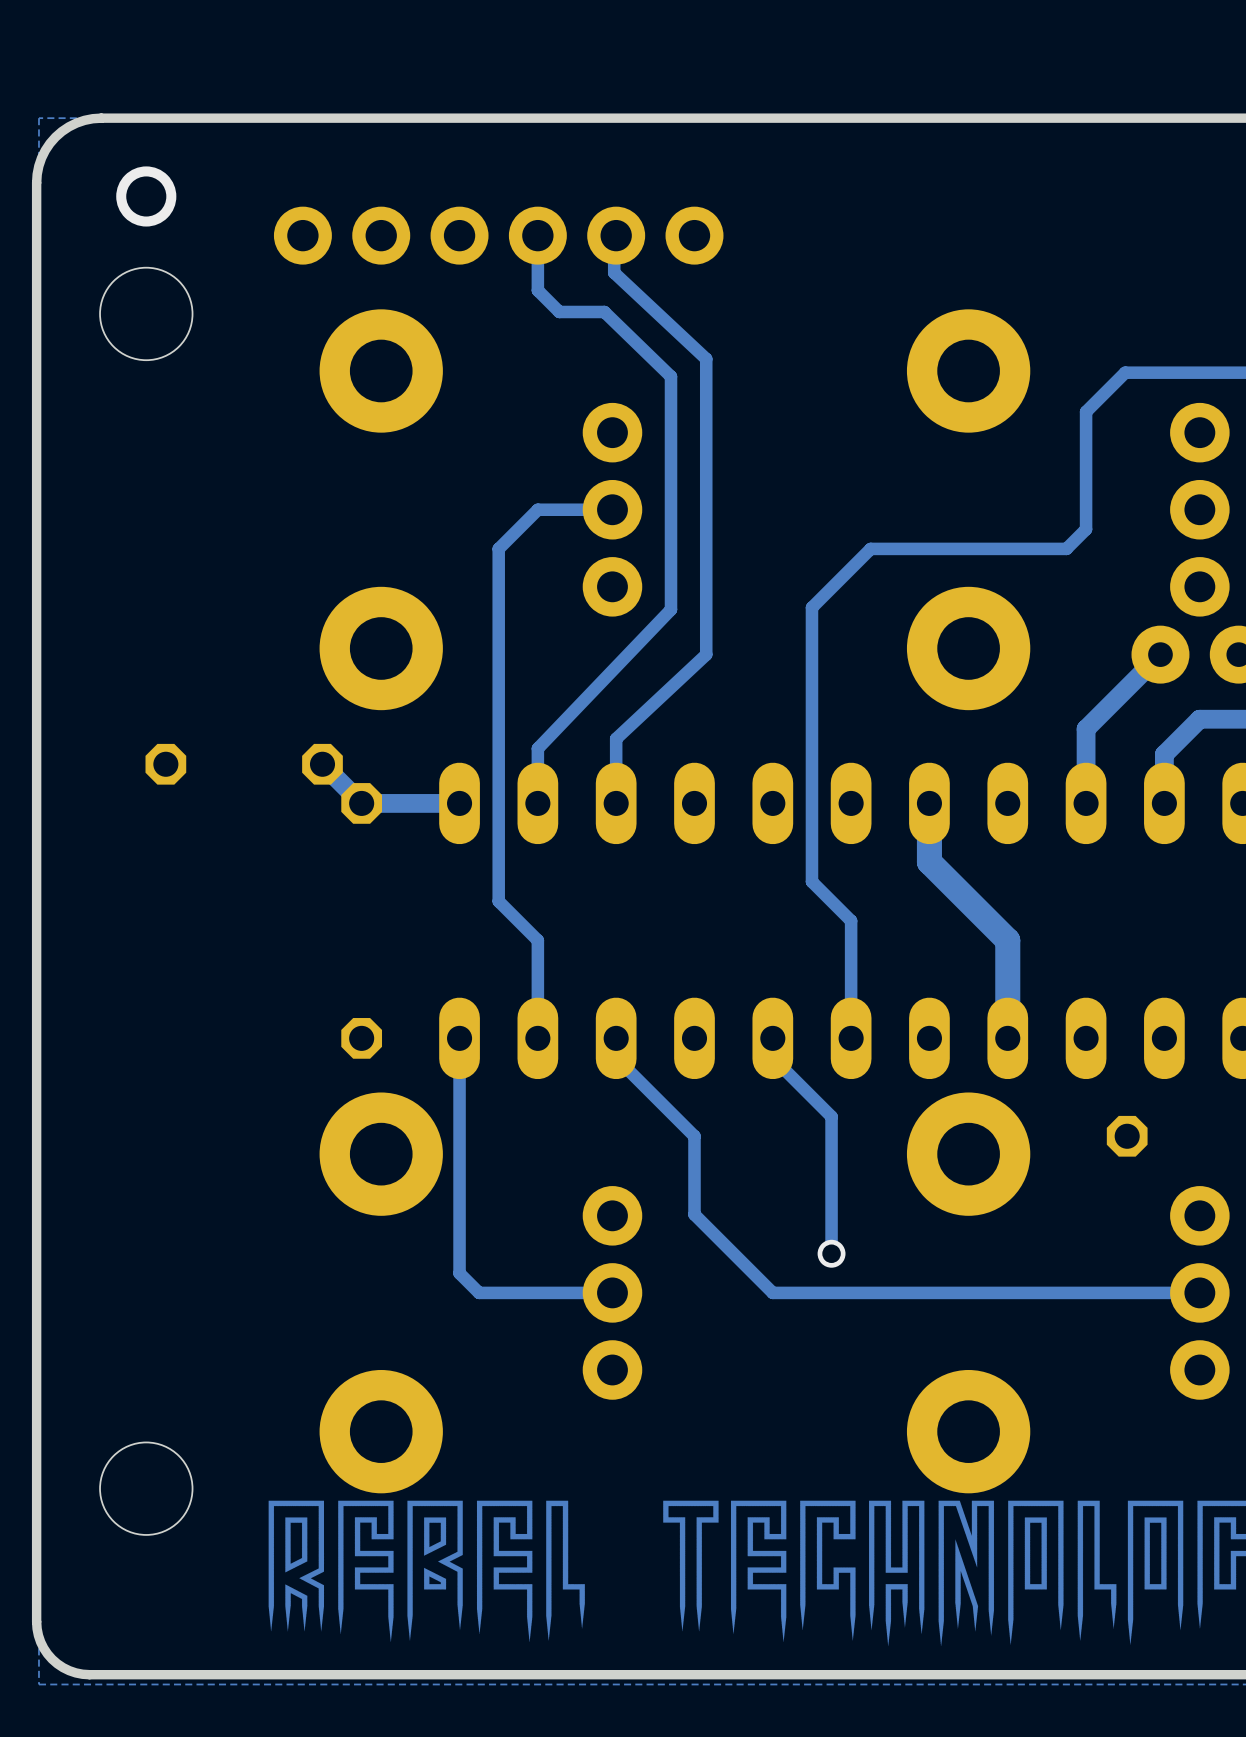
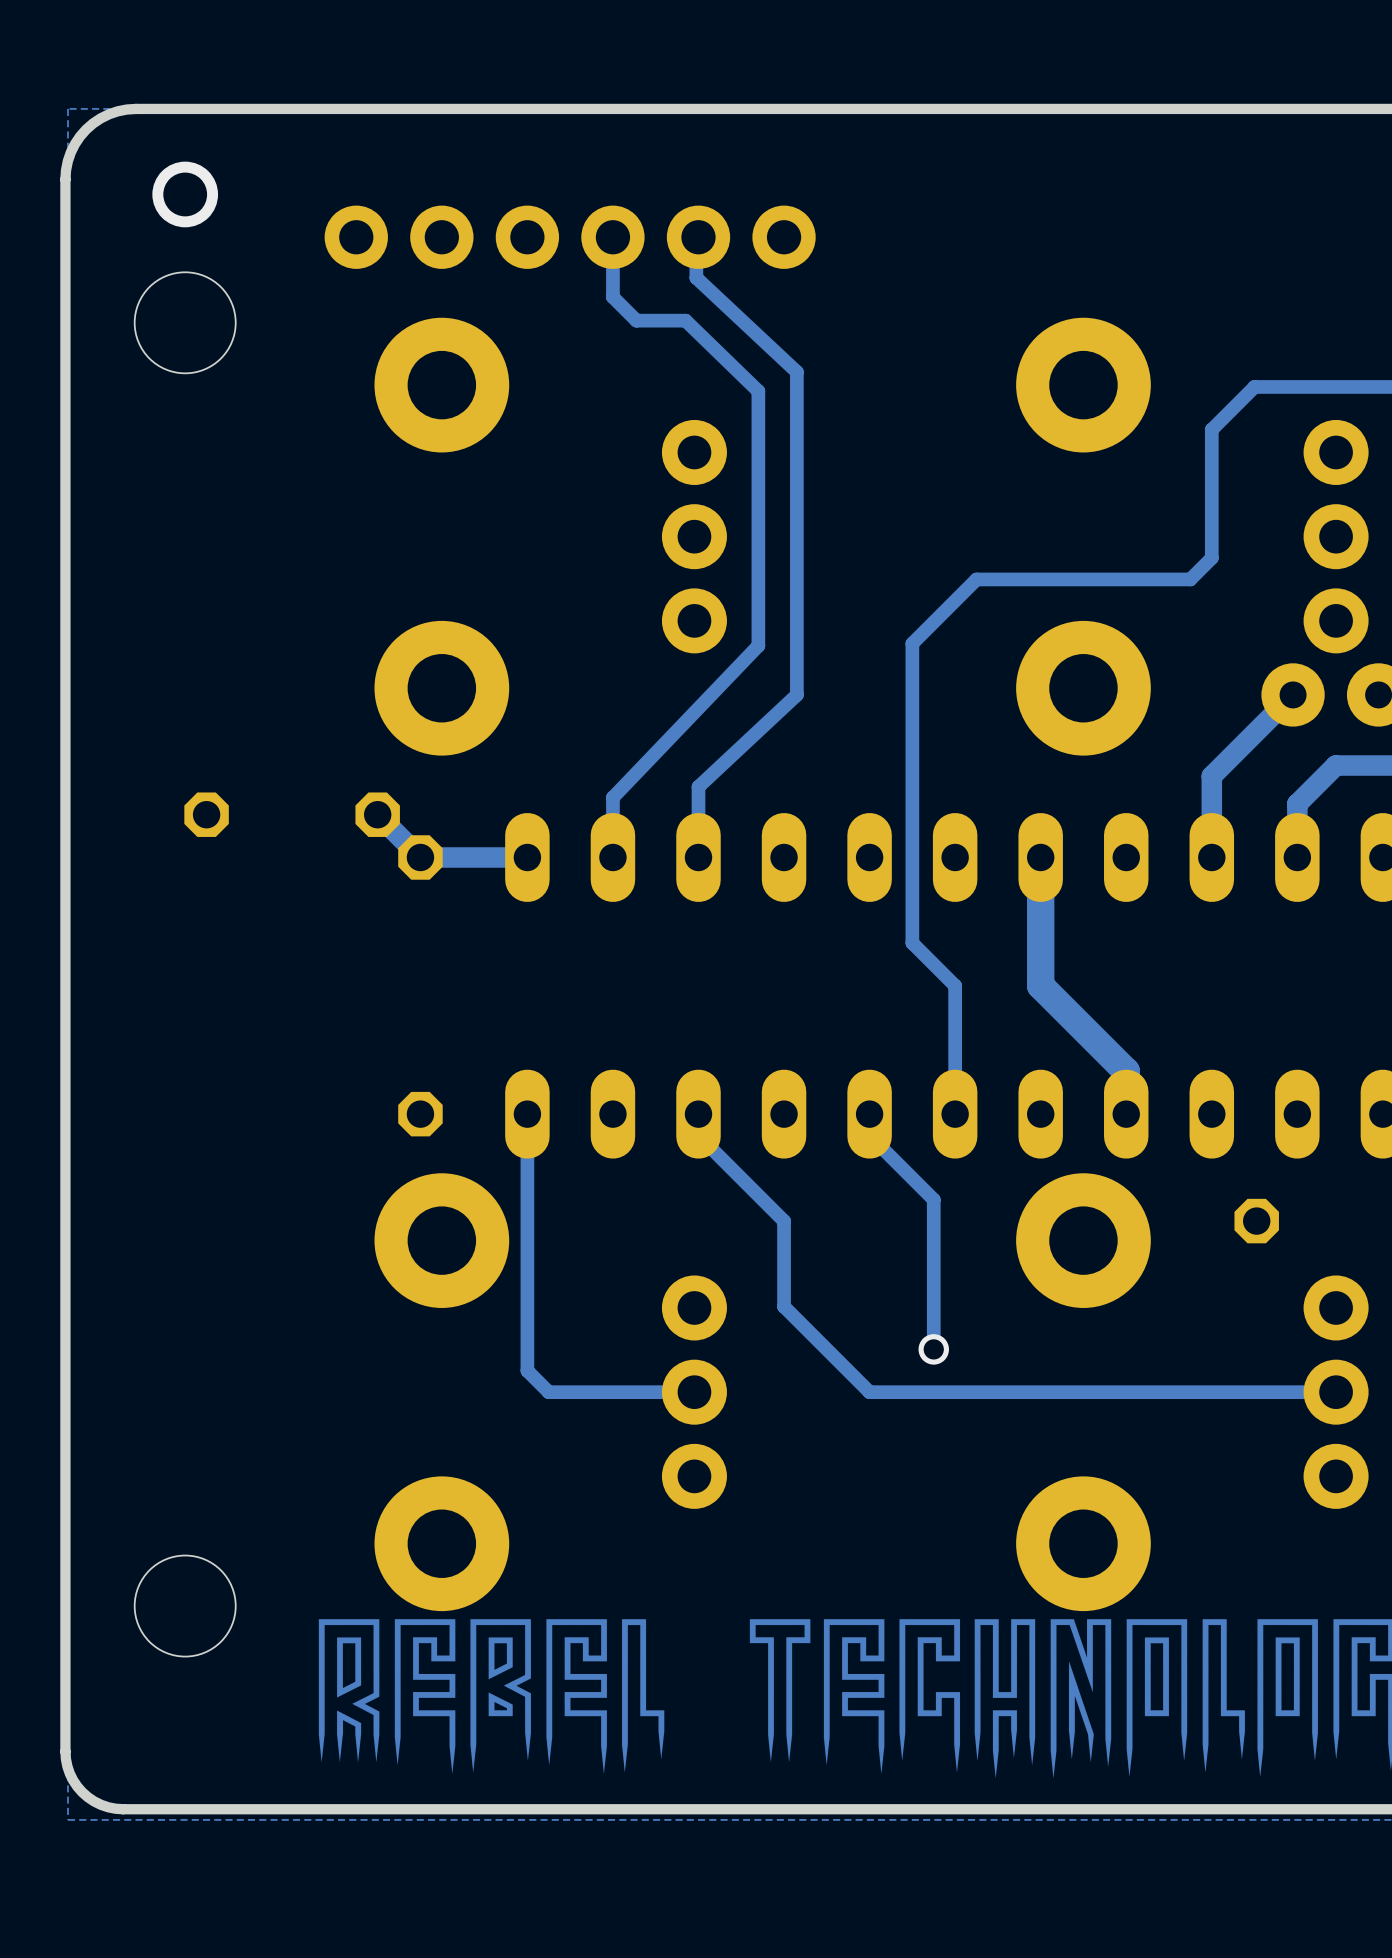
track: (612, 509) (537, 509) (498, 548) (498, 901) (537, 940) (537, 1038) -> none
track: (929, 862) (1007, 940) (1007, 999) -> (1040, 921) (1040, 985) (1126, 1071)

